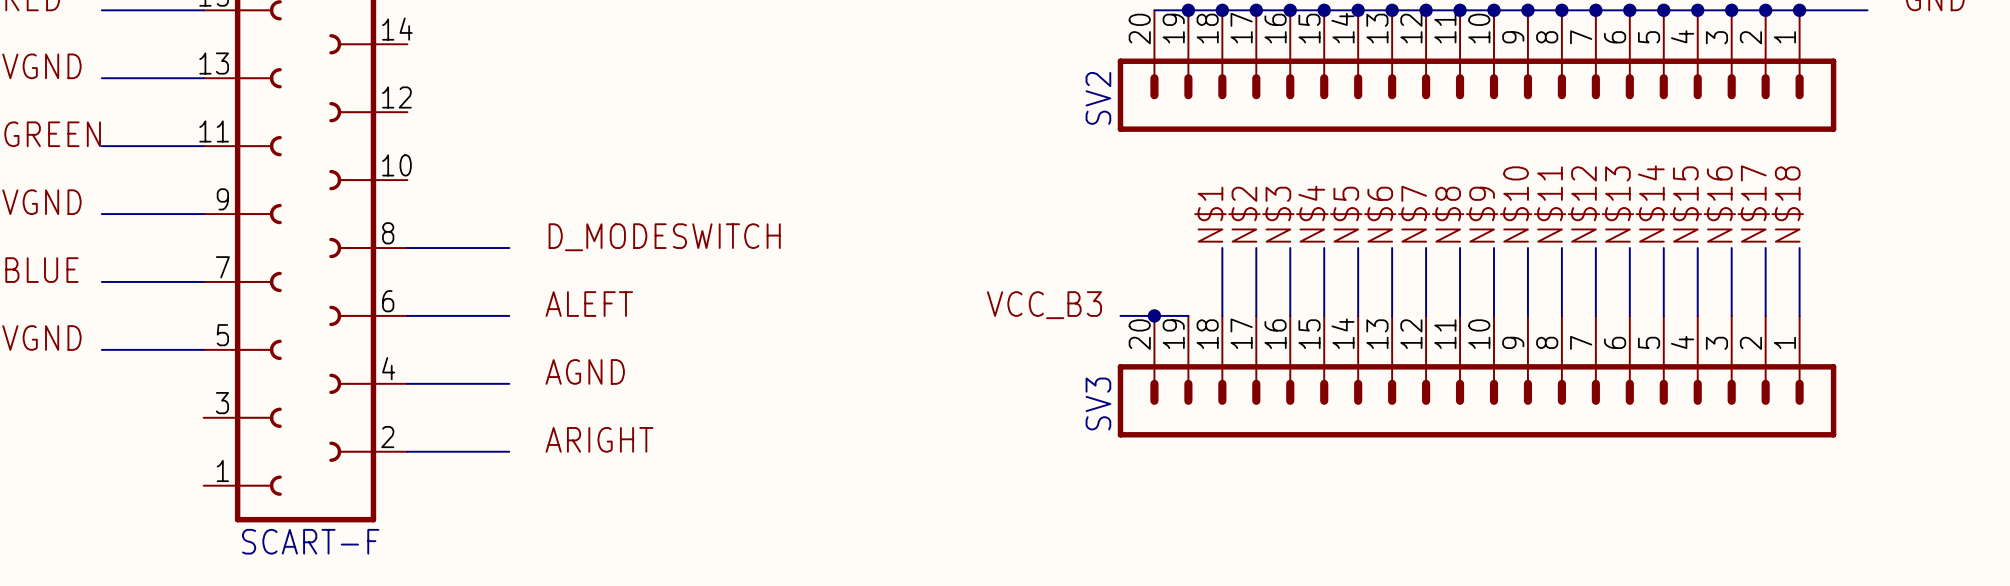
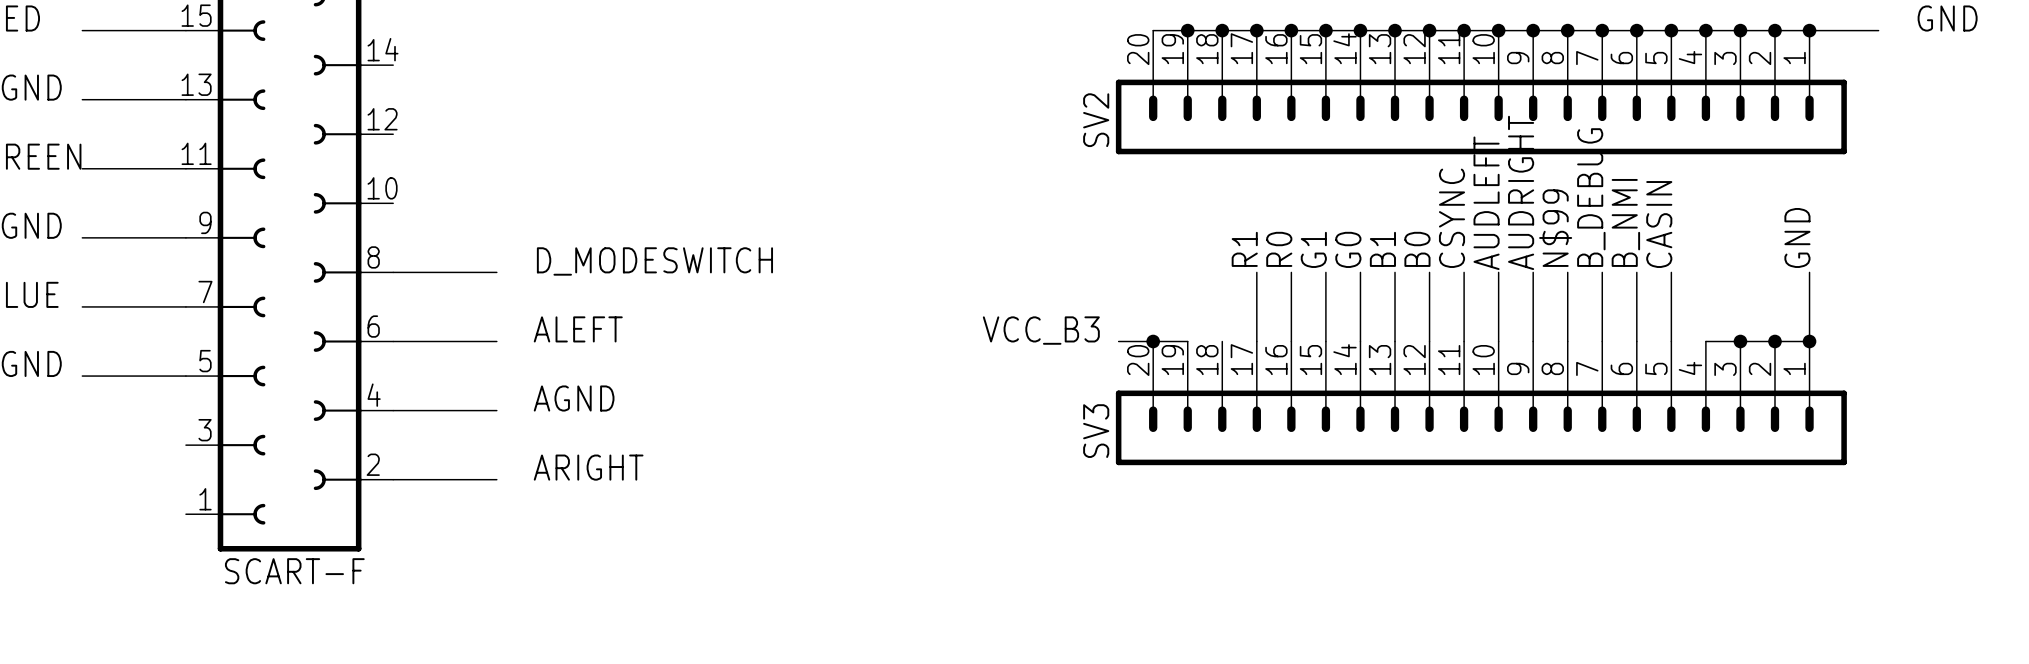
label: N$14 (1651, 203) -> CASIN (1659, 224)
label: N$17 (1753, 203) -> none
label: N$10 (1516, 204) -> AUDRIGHT (1521, 192)
label: N$11 (1550, 204) -> N$99 (1555, 228)
label: N$12 (1583, 204) -> B_DEBUG (1591, 197)
label: N$13 (1617, 204) -> B_NMI (1625, 222)
label: N$15 (1685, 204) -> none
label: N$16 (1719, 204) -> none
label: N$18 (1787, 204) -> GND (1797, 237)
label: N$1 (1210, 214) -> none
label: N$2 (1244, 214) -> R1 (1244, 249)
label: N$3 (1278, 214) -> R0 (1279, 249)
label: N$4 (1312, 214) -> G1 (1313, 249)
label: N$5 (1346, 214) -> G0 (1348, 249)
label: N$6 (1380, 214) -> B1 (1382, 249)
label: N$7 (1414, 214) -> B0 (1417, 249)
label: N$8 (1448, 214) -> CSYNC (1452, 218)
label: N$9 (1482, 214) -> AUDLEFT (1486, 203)
wire: (1222, 248) (1222, 315) -> none
wire: (1697, 248) (1697, 315) -> (1809, 341) (1705, 341)
wire: (1731, 248) (1731, 315) -> none
wire: (1765, 248) (1765, 315) -> none
junction: none -> (1740, 341)
junction: none -> (1774, 341)
junction: none -> (1809, 341)

